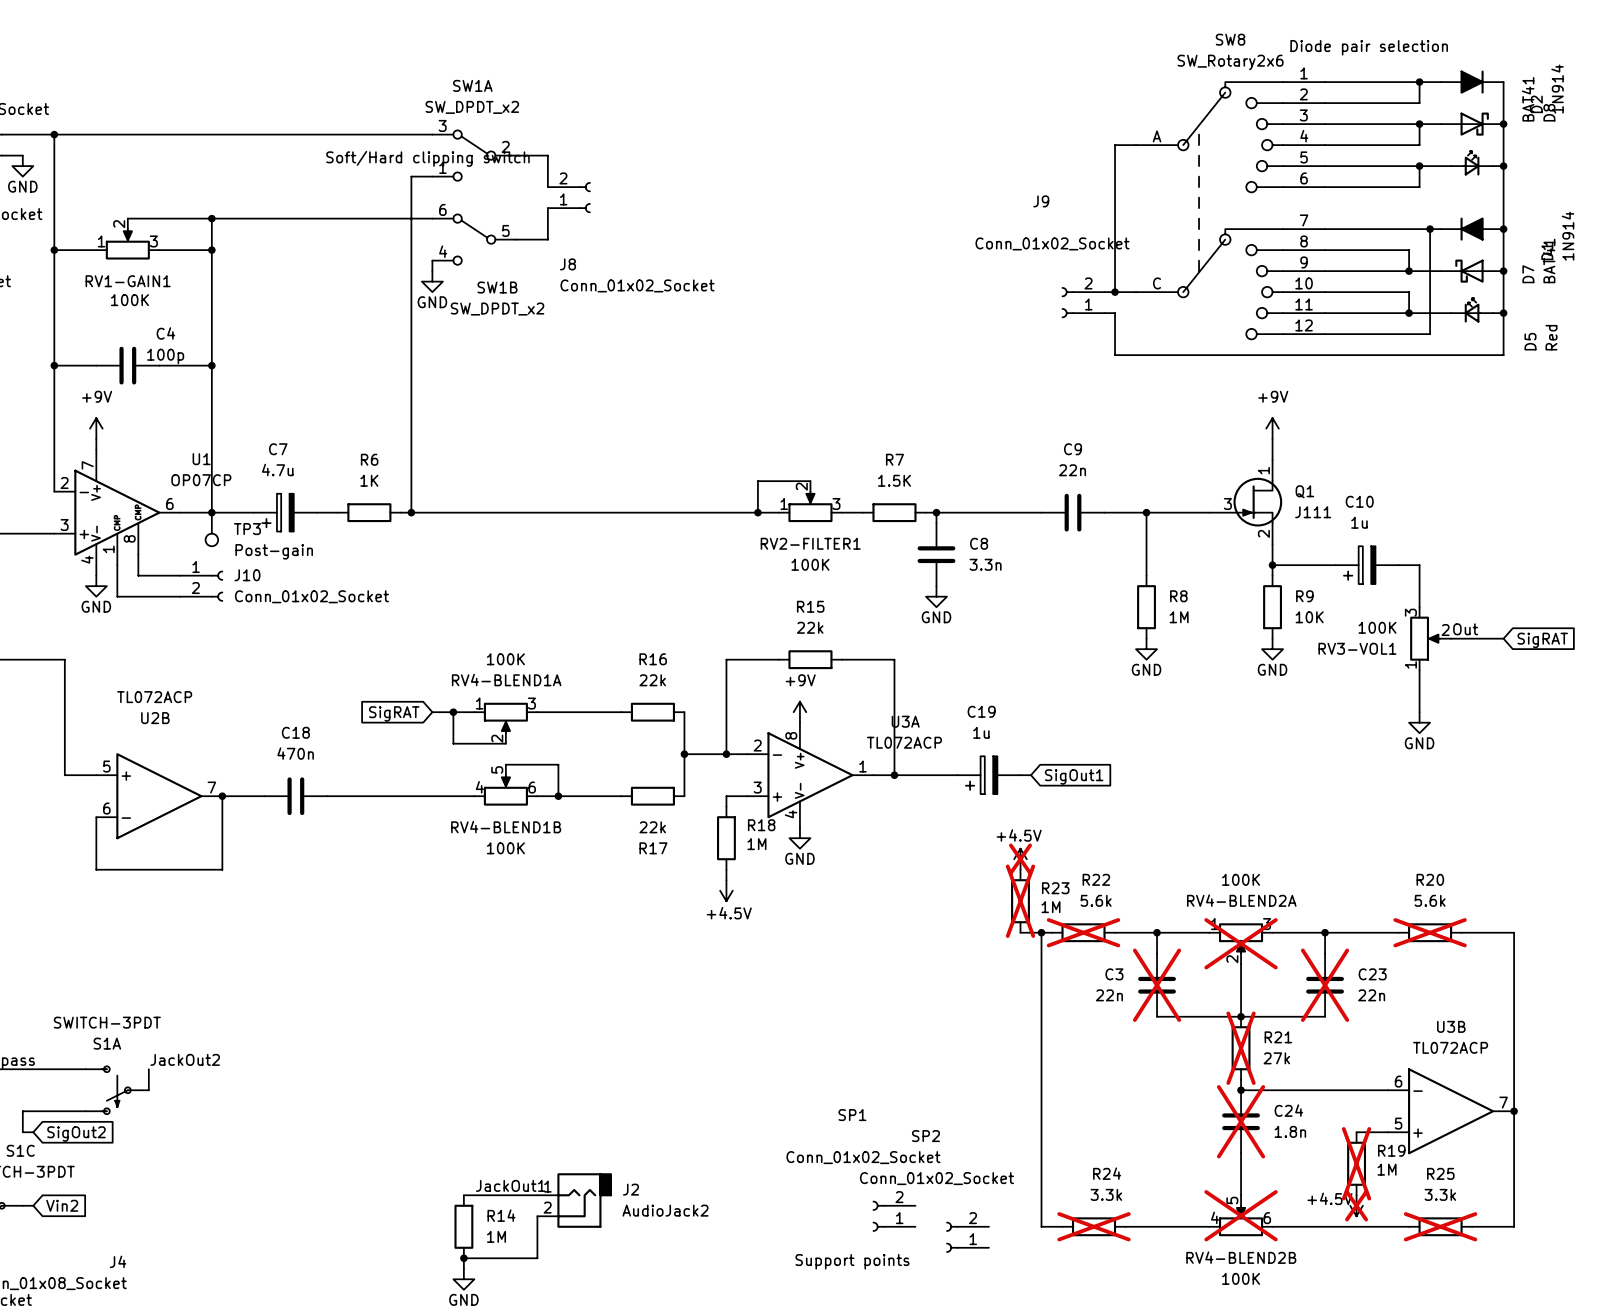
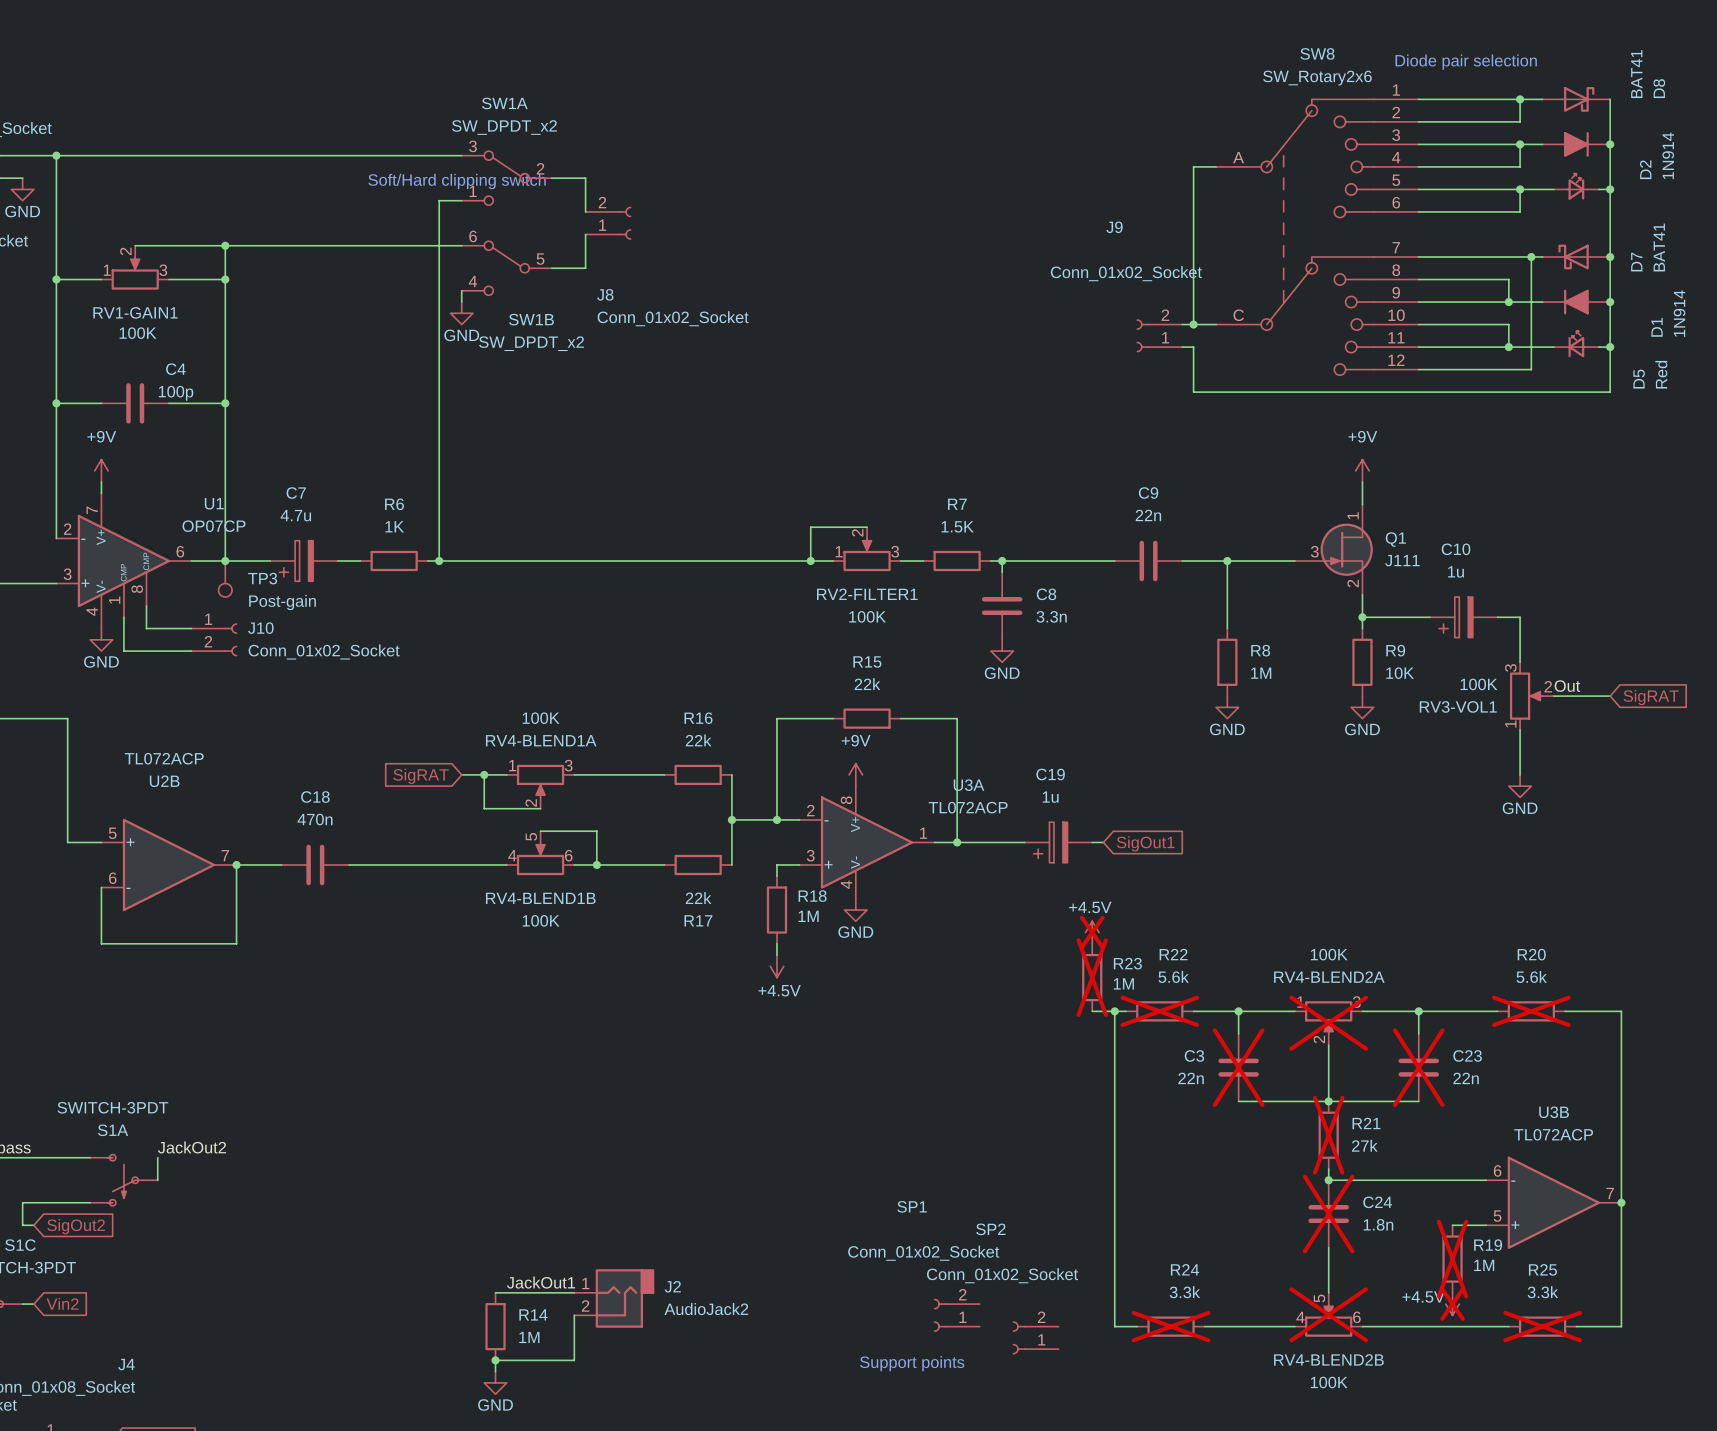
D2 position: (1472, 82) -> (1576, 144)
D8 position: (1472, 124) -> (1576, 99)
D1 position: (1472, 229) -> (1576, 302)
D7 position: (1472, 271) -> (1576, 257)

